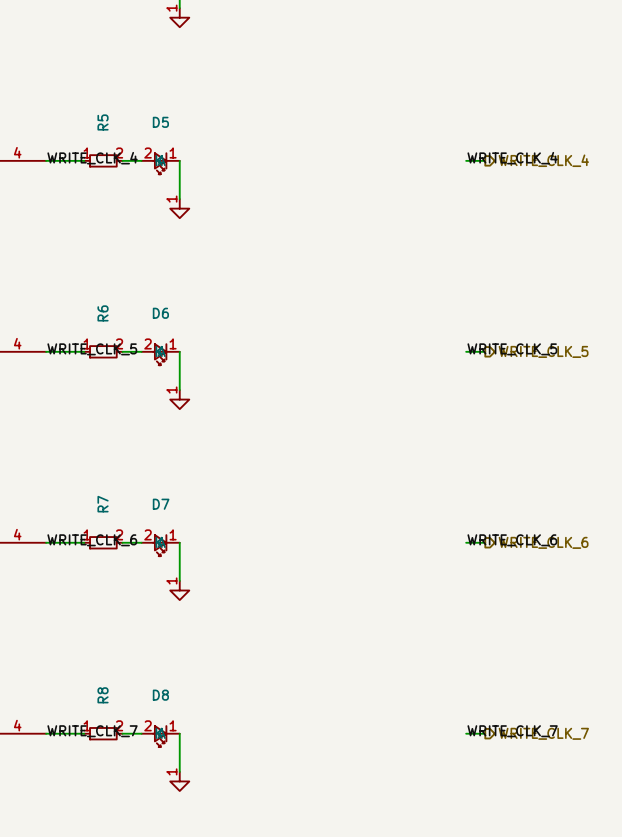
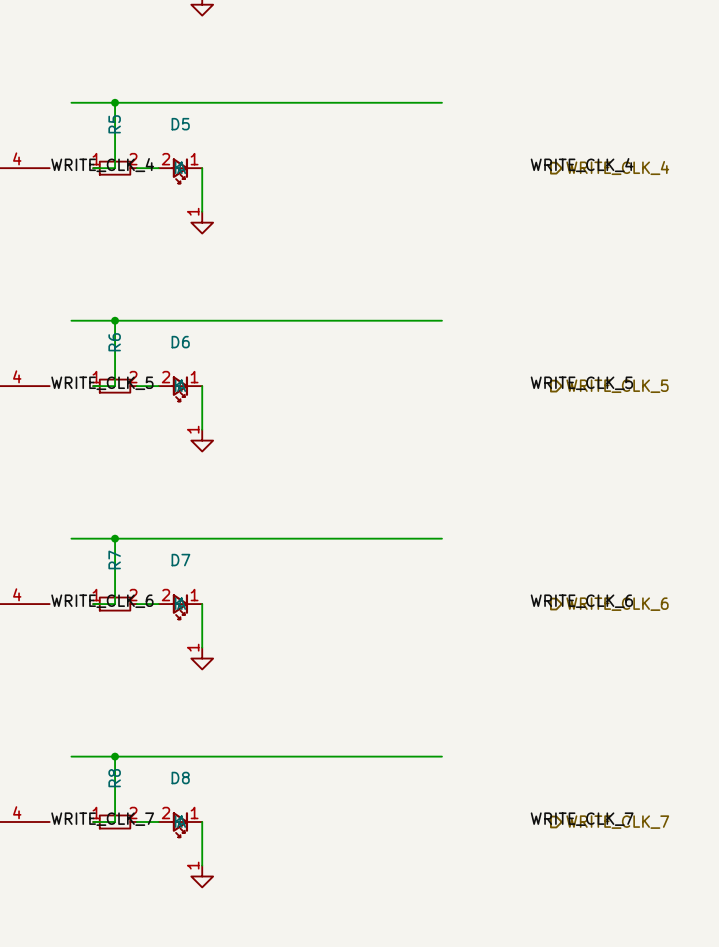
wire: none -> (71, 102) (441, 102)
junction: none -> (115, 102)
wire: (46, 160) (84, 160) -> (115, 102) (115, 168) (93, 168)
wire: (466, 160) (485, 160) -> none
wire: none -> (71, 320) (441, 320)
junction: none -> (115, 320)
wire: (46, 351) (84, 351) -> (115, 320) (115, 386) (93, 386)
wire: (466, 351) (485, 351) -> none
wire: none -> (71, 538) (441, 538)
junction: none -> (115, 538)
wire: (46, 542) (84, 542) -> (115, 538) (115, 604) (93, 604)
wire: (466, 542) (485, 542) -> none
wire: none -> (71, 756) (441, 756)
junction: none -> (115, 756)
wire: (46, 733) (84, 733) -> (115, 756) (115, 821) (93, 821)
wire: (466, 733) (485, 733) -> none

